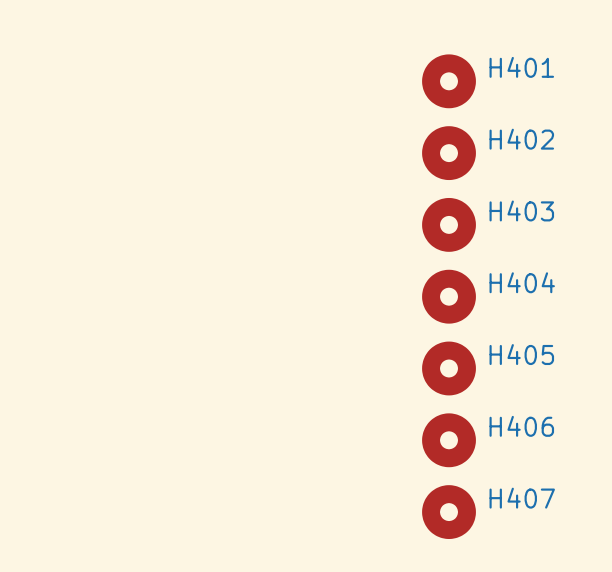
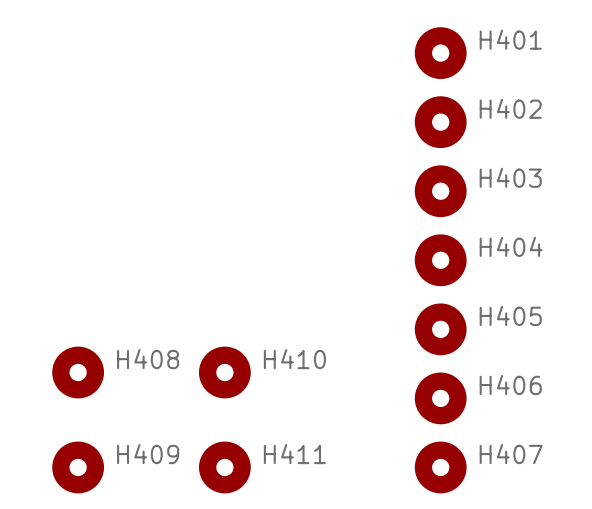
H408: none -> (78, 372)
H410: none -> (224, 372)
H409: none -> (78, 467)
H411: none -> (224, 467)

